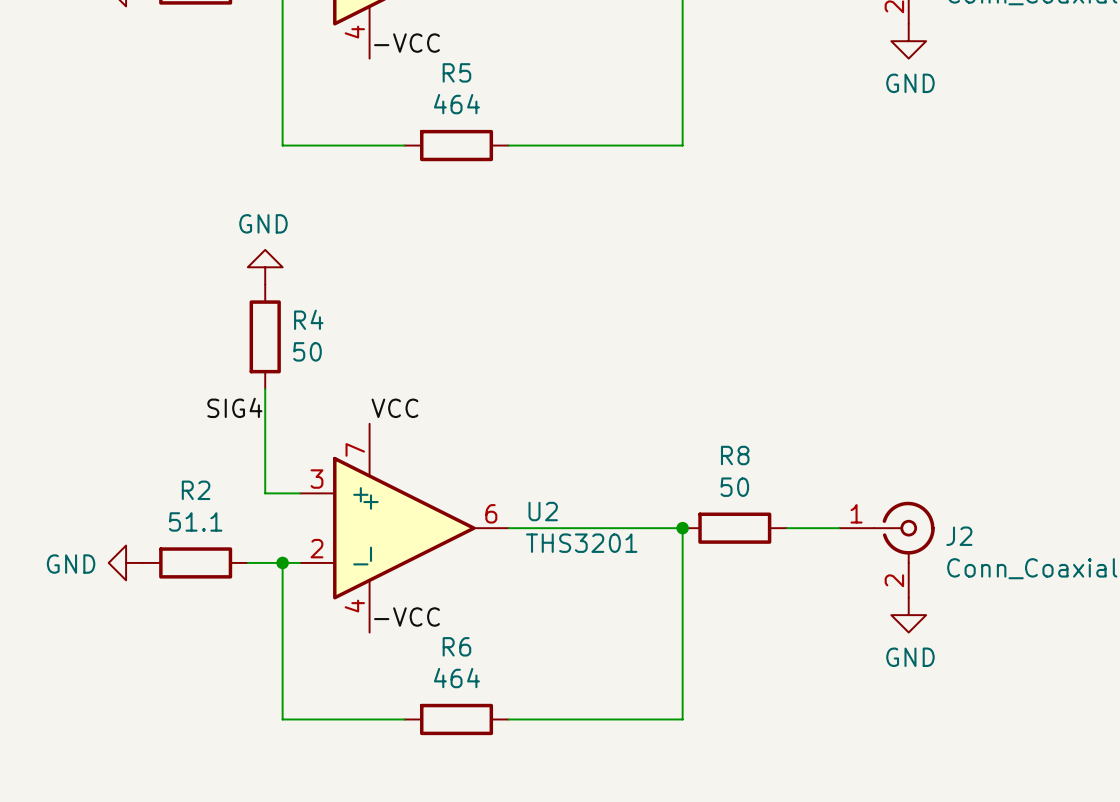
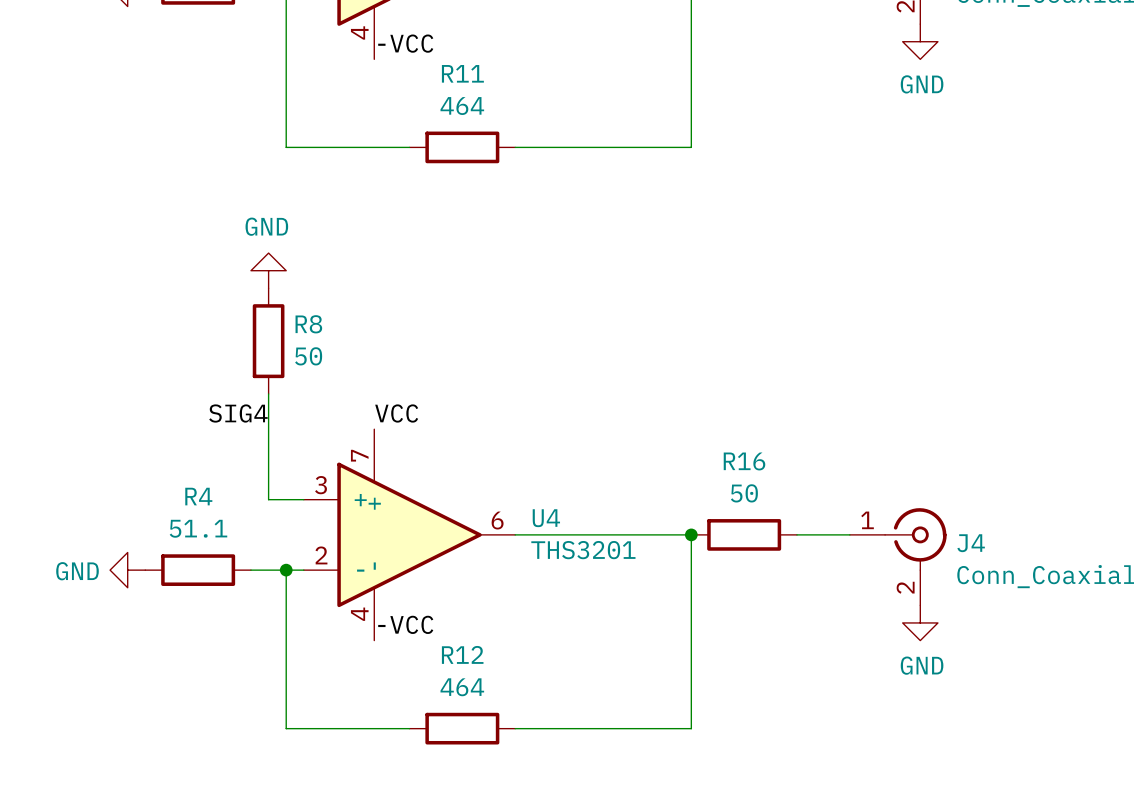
R5 name: R5 (456, 72) -> R11 (462, 73)
R4 name: R4 (308, 319) -> R8 (308, 324)
R8 name: R8 (735, 455) -> R16 (744, 461)
R2 name: R2 (196, 490) -> R4 (198, 496)
U2 name: U2 (543, 511) -> U4 (546, 518)
J2 name: J2 (959, 536) -> J4 (971, 543)
R6 name: R6 (456, 646) -> R12 (462, 654)

